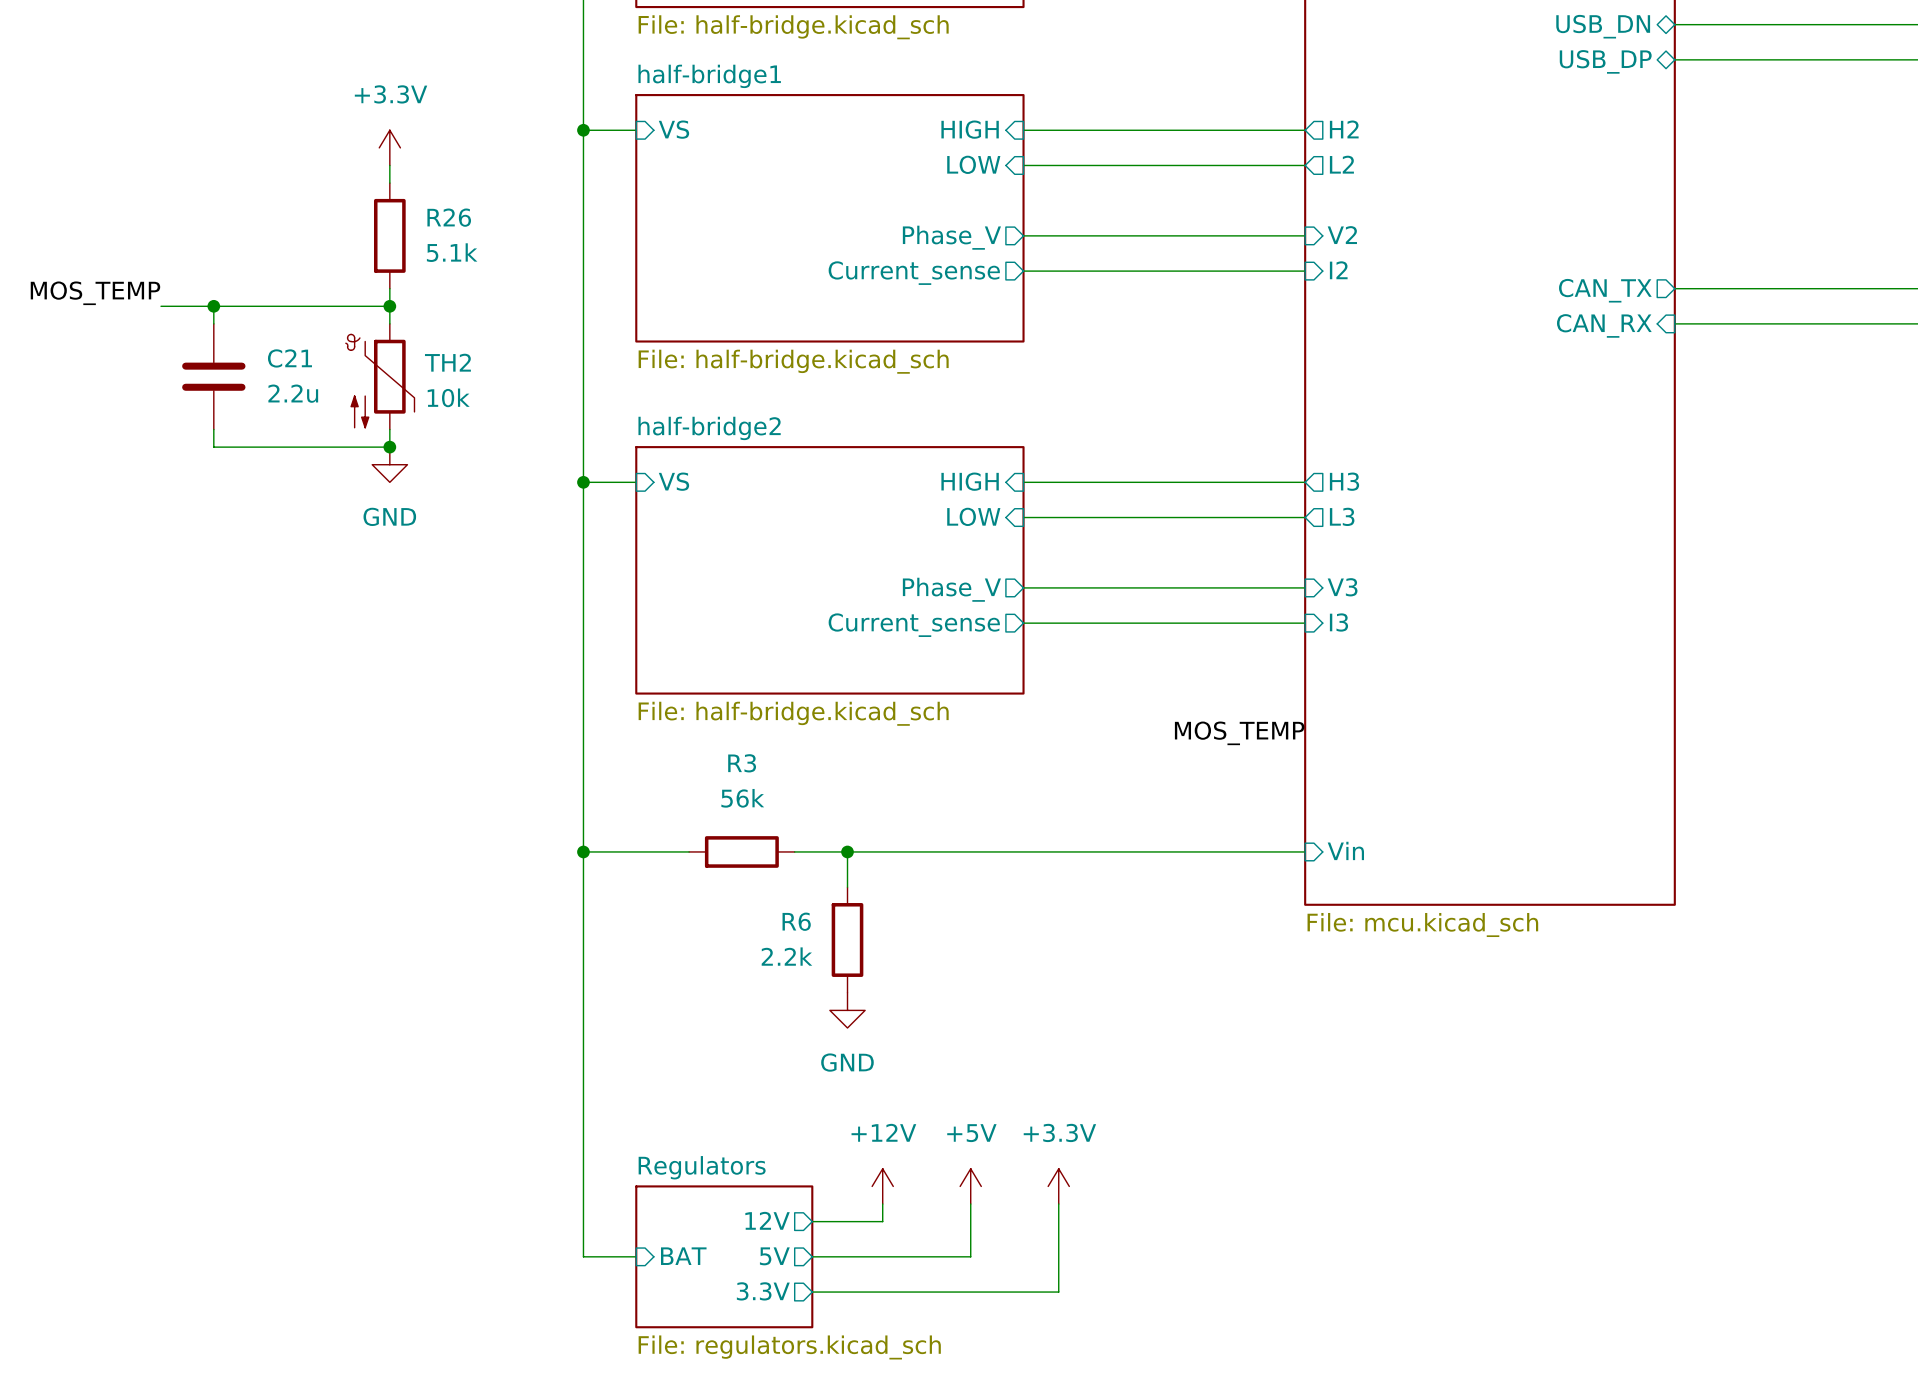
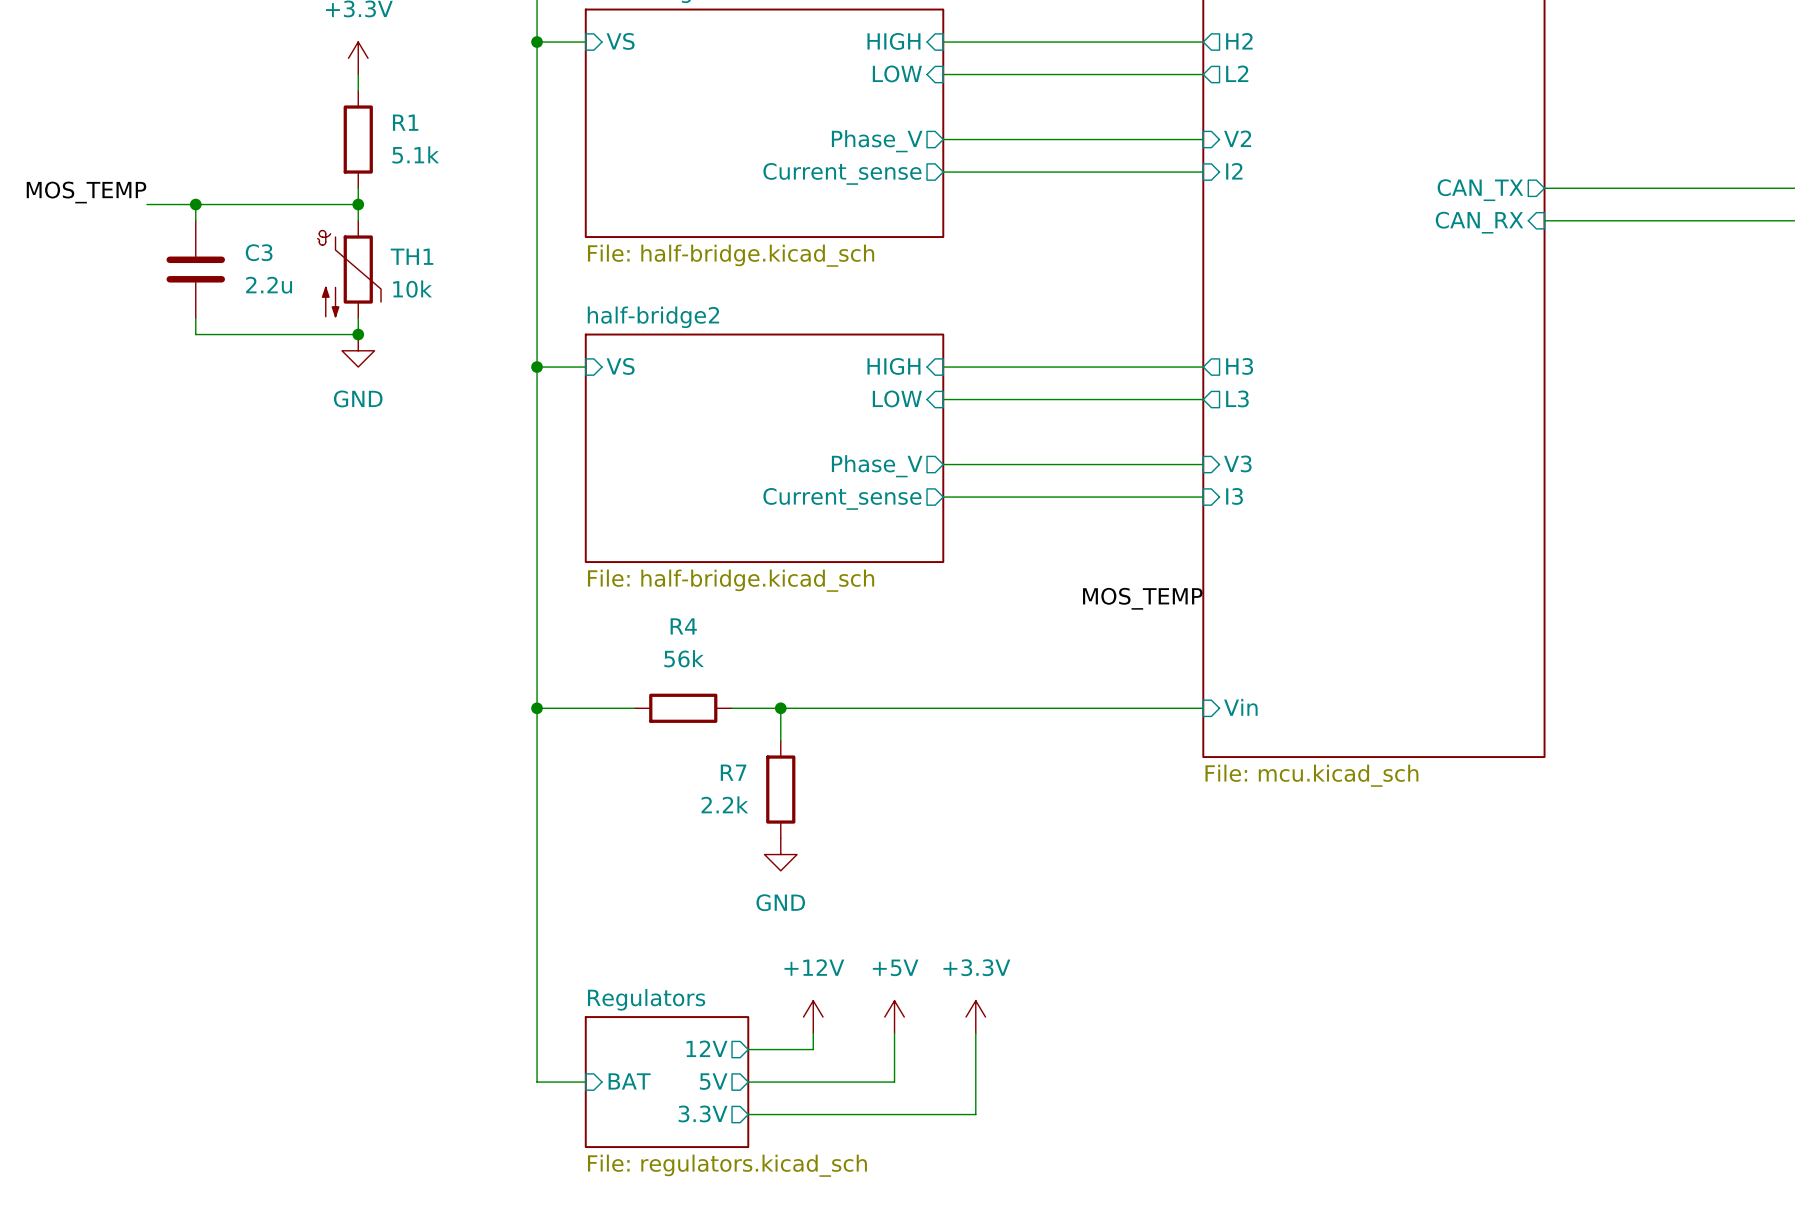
R26 name: R26 (449, 217) -> R1 (405, 122)
C21 name: C21 (289, 358) -> C3 (259, 252)
TH2 name: TH2 (447, 362) -> TH1 (411, 256)
R3 name: R3 (742, 763) -> R4 (683, 626)
R6 name: R6 (796, 921) -> R7 (733, 772)

